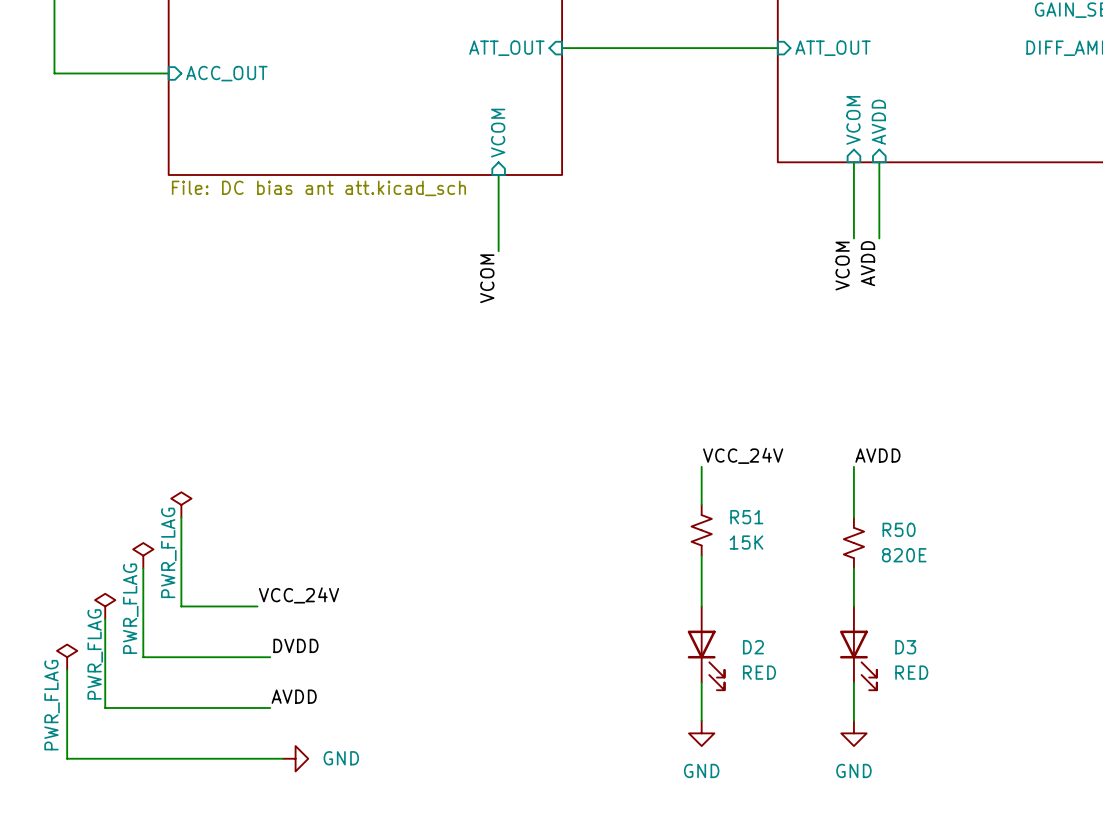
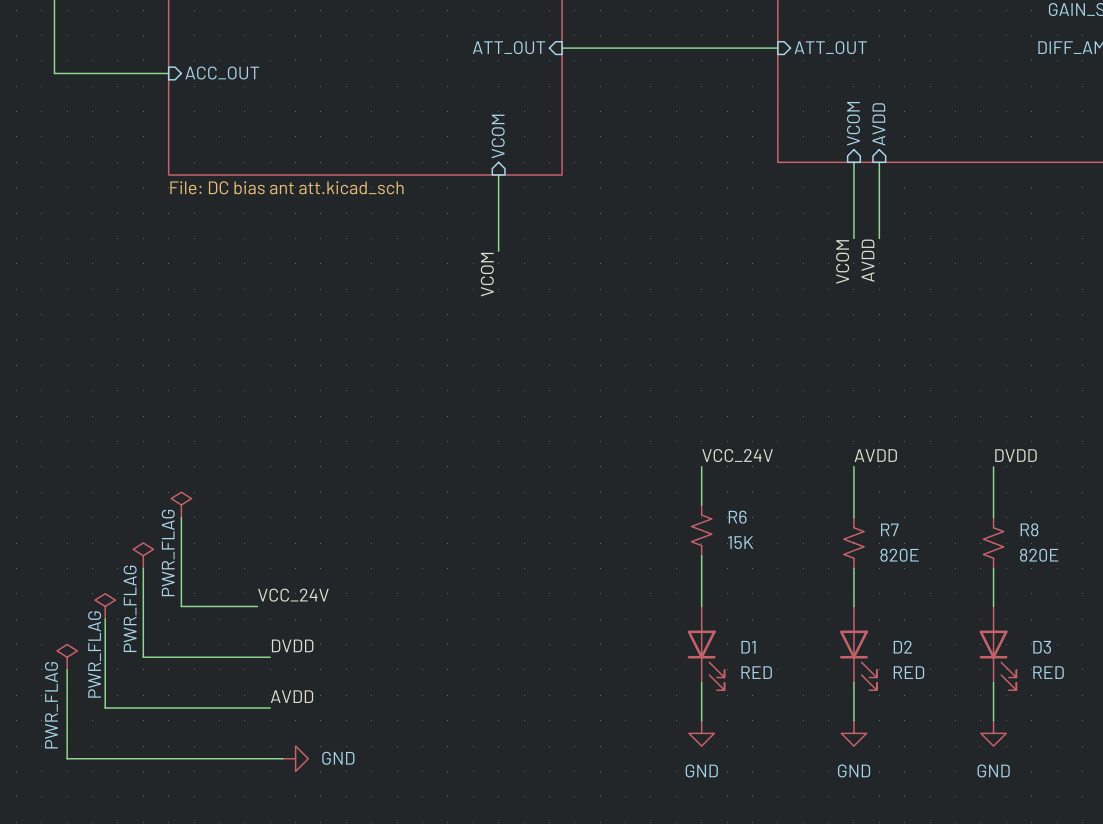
label: none -> DVDD (1015, 455)
wire: none -> (993, 466) (993, 517)
R51 name: R51 (746, 517) -> R6 (737, 517)
R50 name: R50 (899, 529) -> R7 (889, 529)
R8: none -> 820E (993, 543)
wire: none -> (993, 568) (993, 606)
D2 name: D2 (753, 647) -> D1 (748, 647)
D3 name: D3 (905, 647) -> D2 (902, 647)
D3: none -> RED (997, 648)
wire: none -> (993, 682) (993, 720)
power symbol: none -> GND (993, 733)

